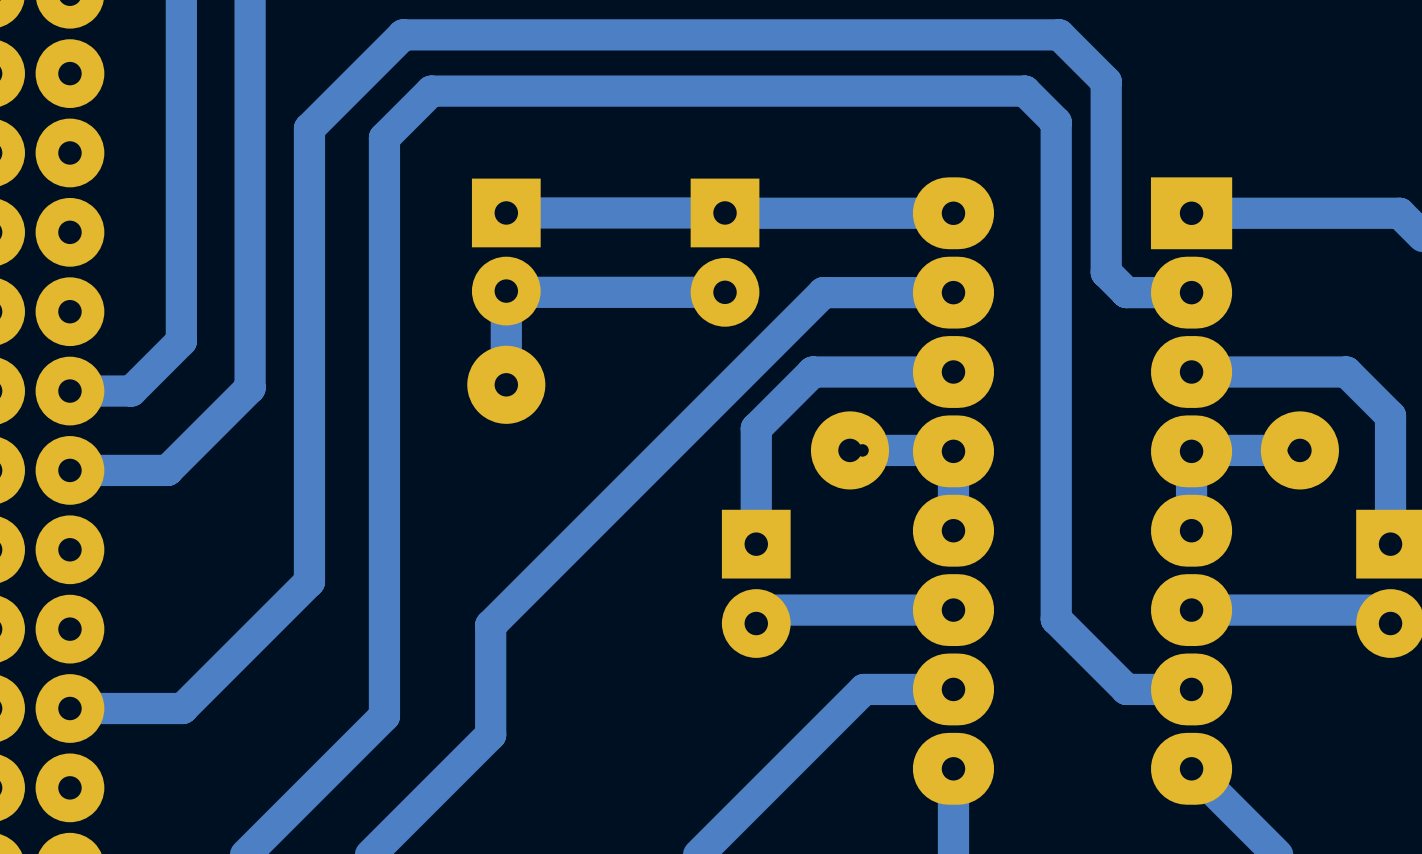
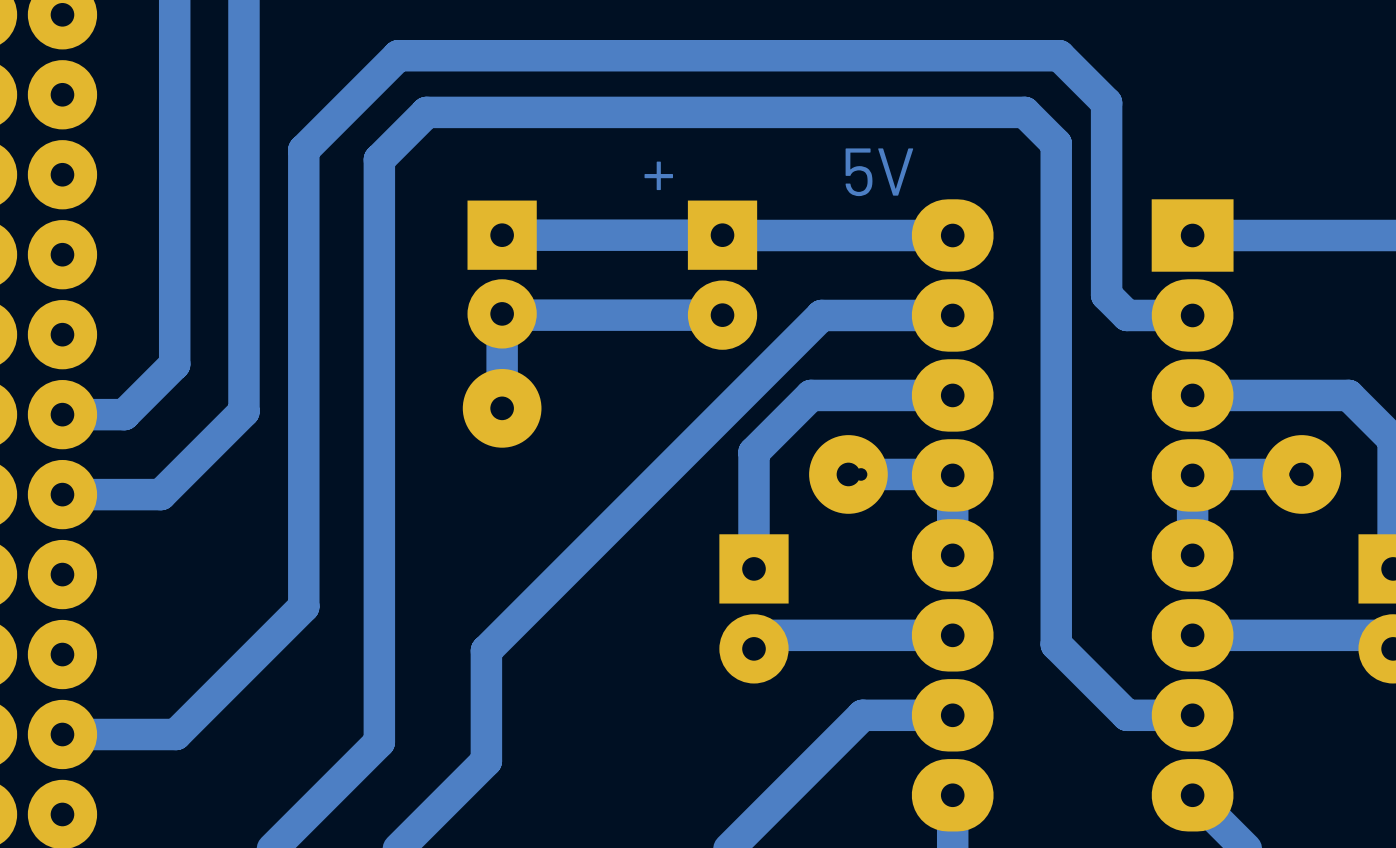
text: none -> 5V (879, 172)
text: none -> + (658, 175)

